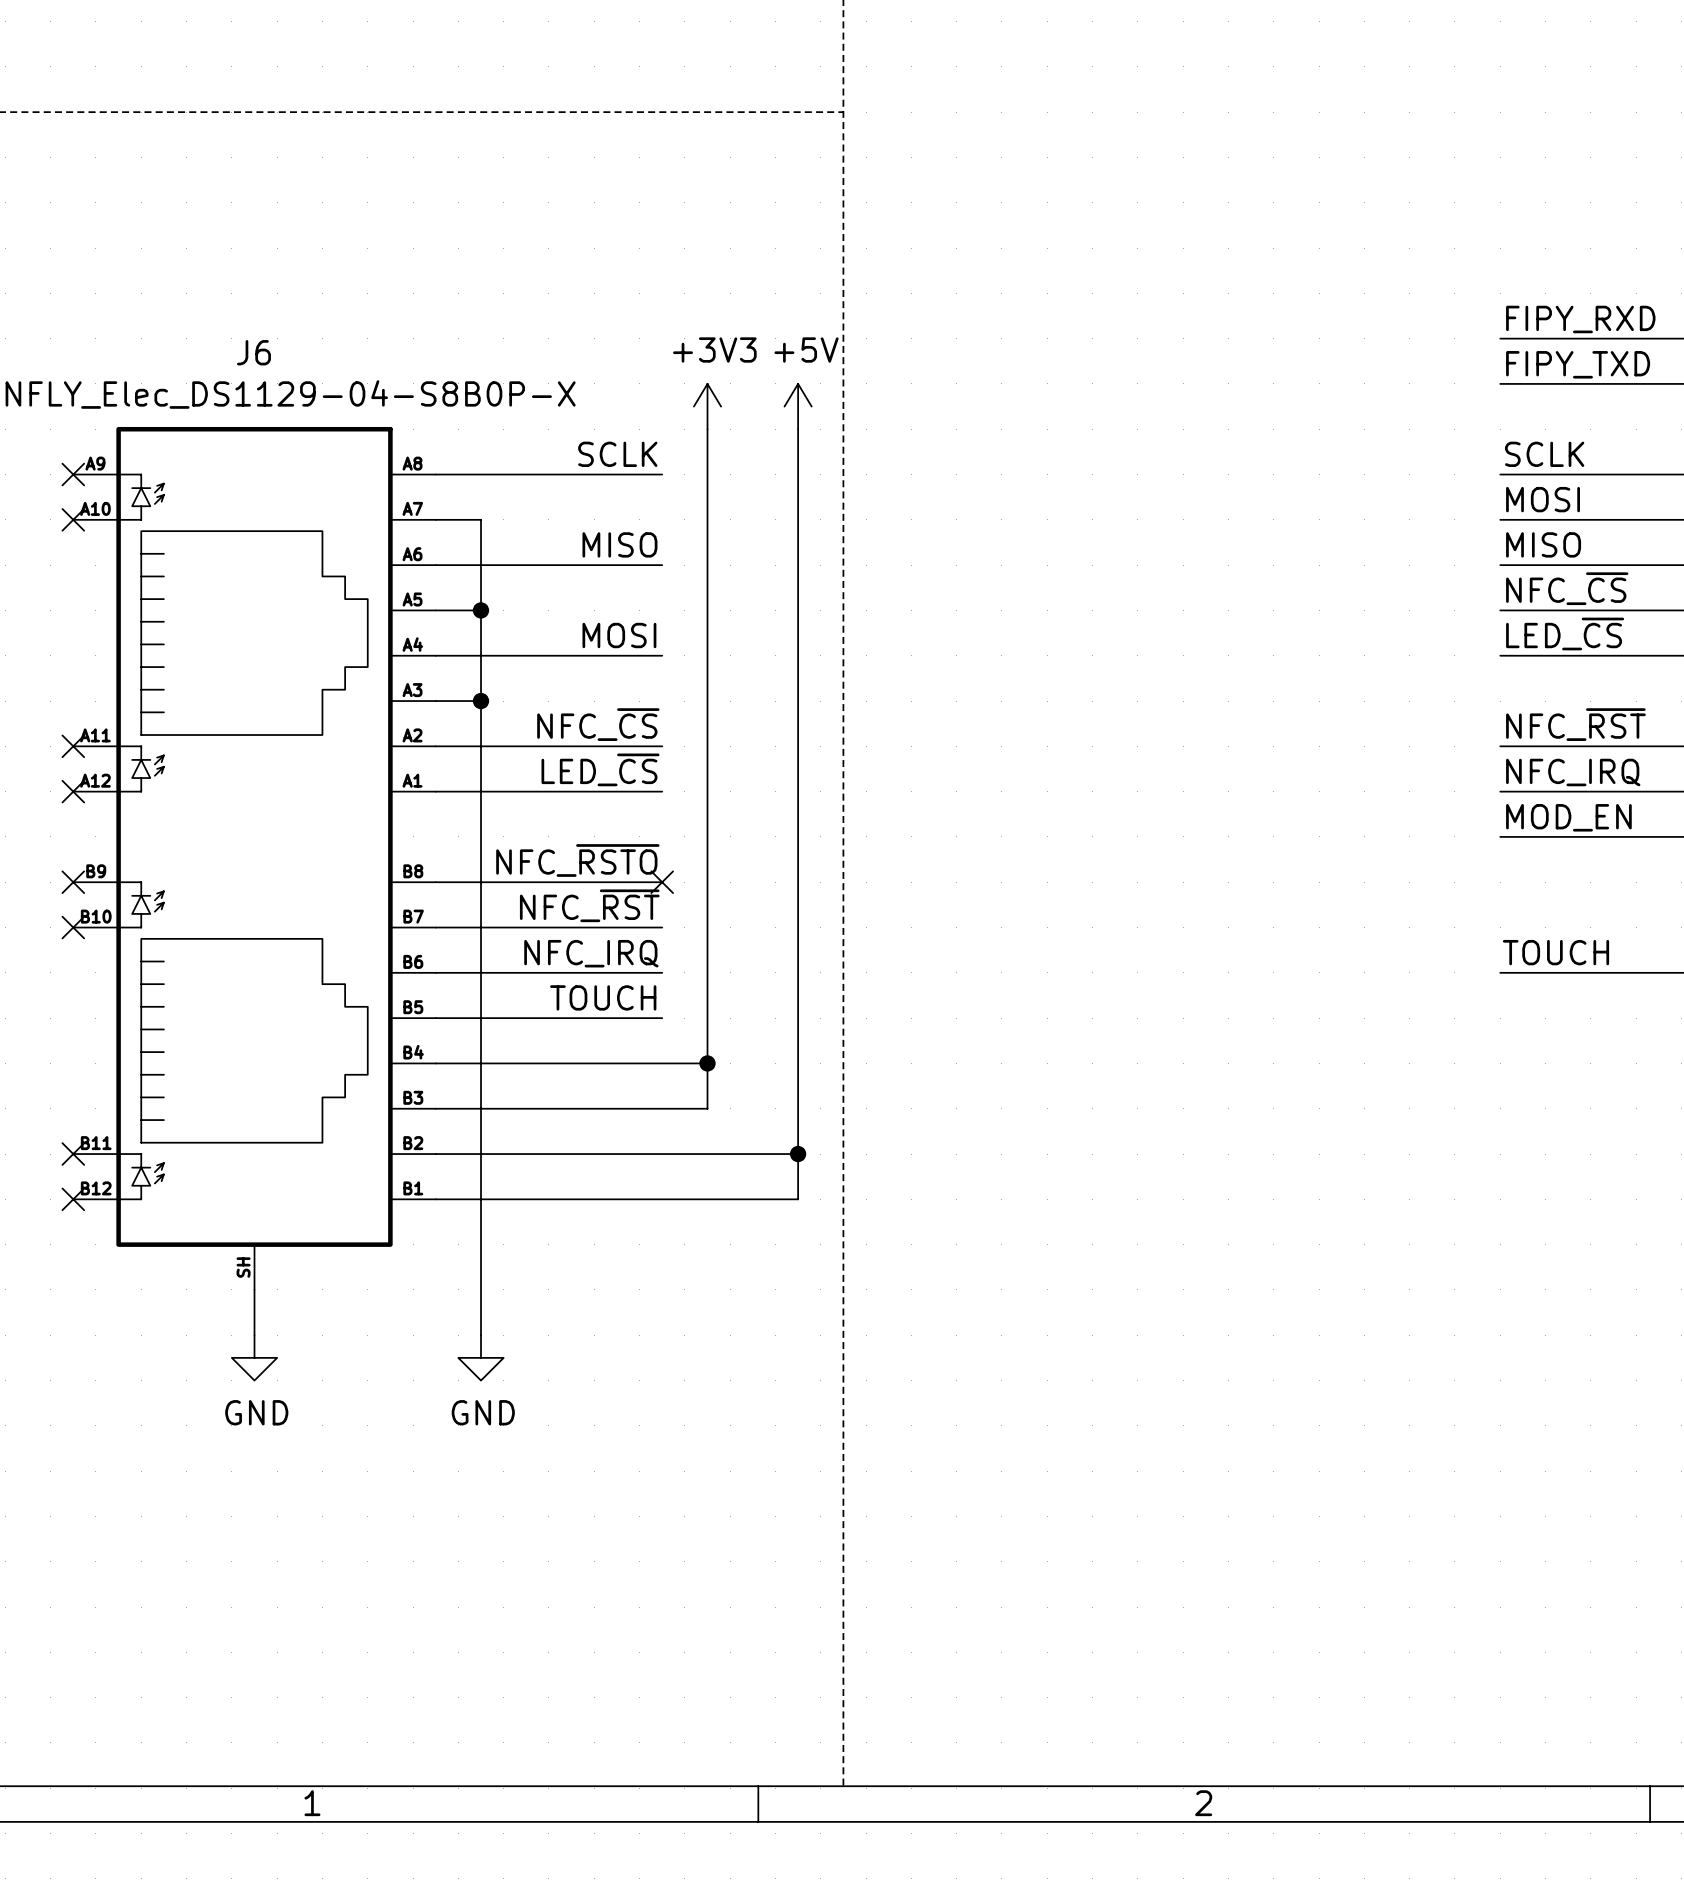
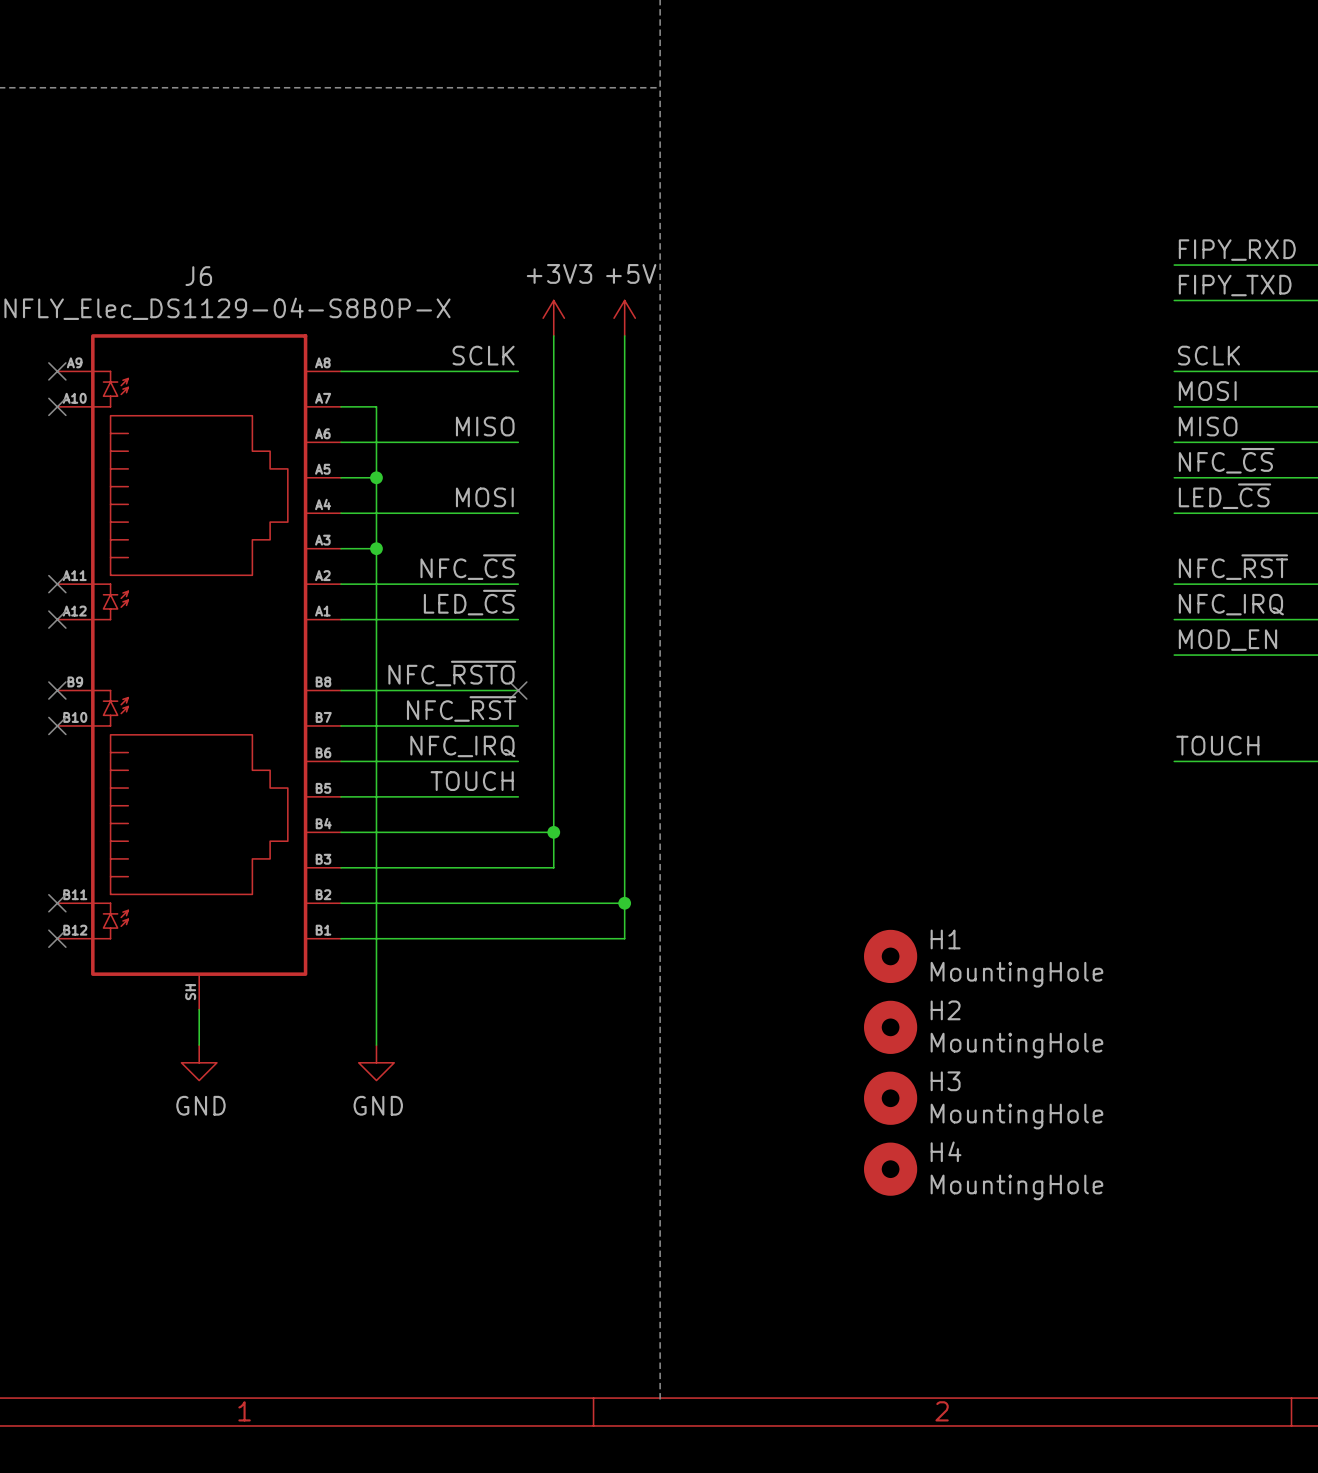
H1: none -> MountingHole (890, 956)
H2: none -> MountingHole (890, 1027)
H3: none -> MountingHole (890, 1098)
H4: none -> MountingHole (890, 1169)

